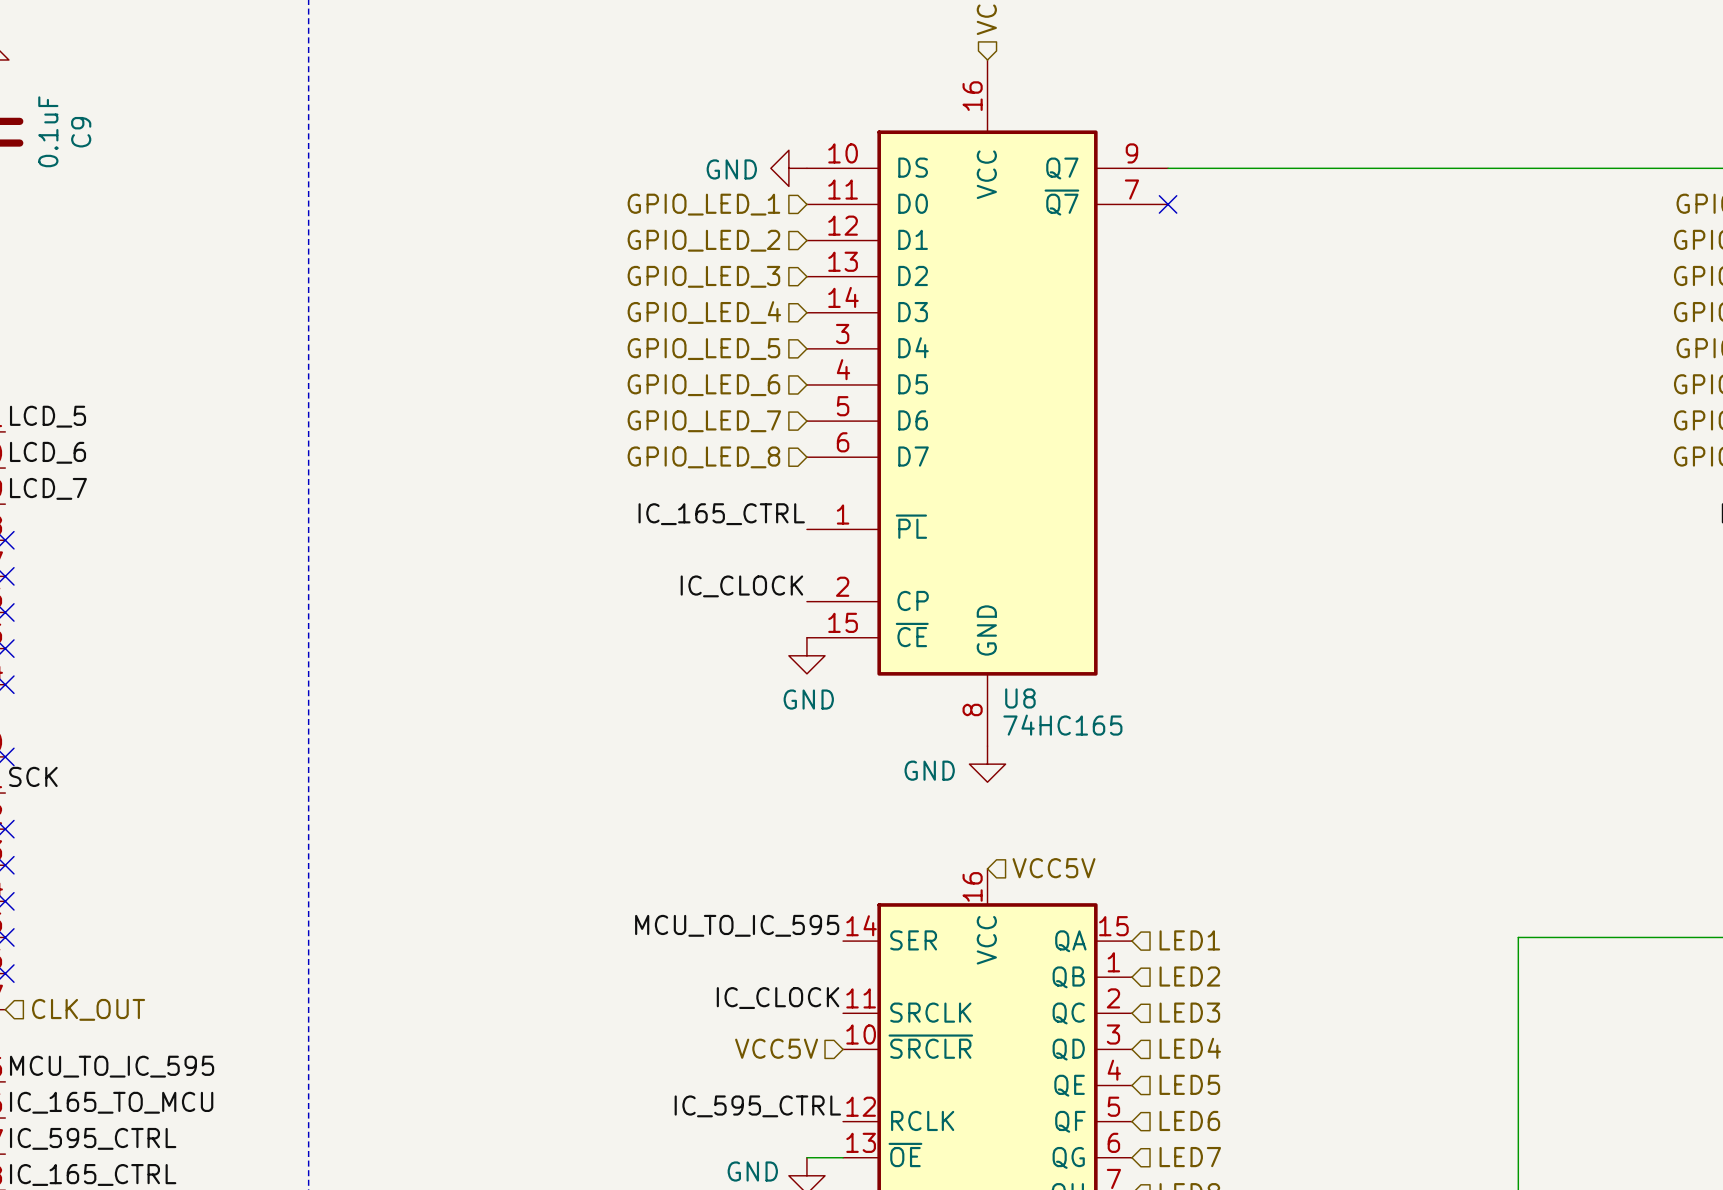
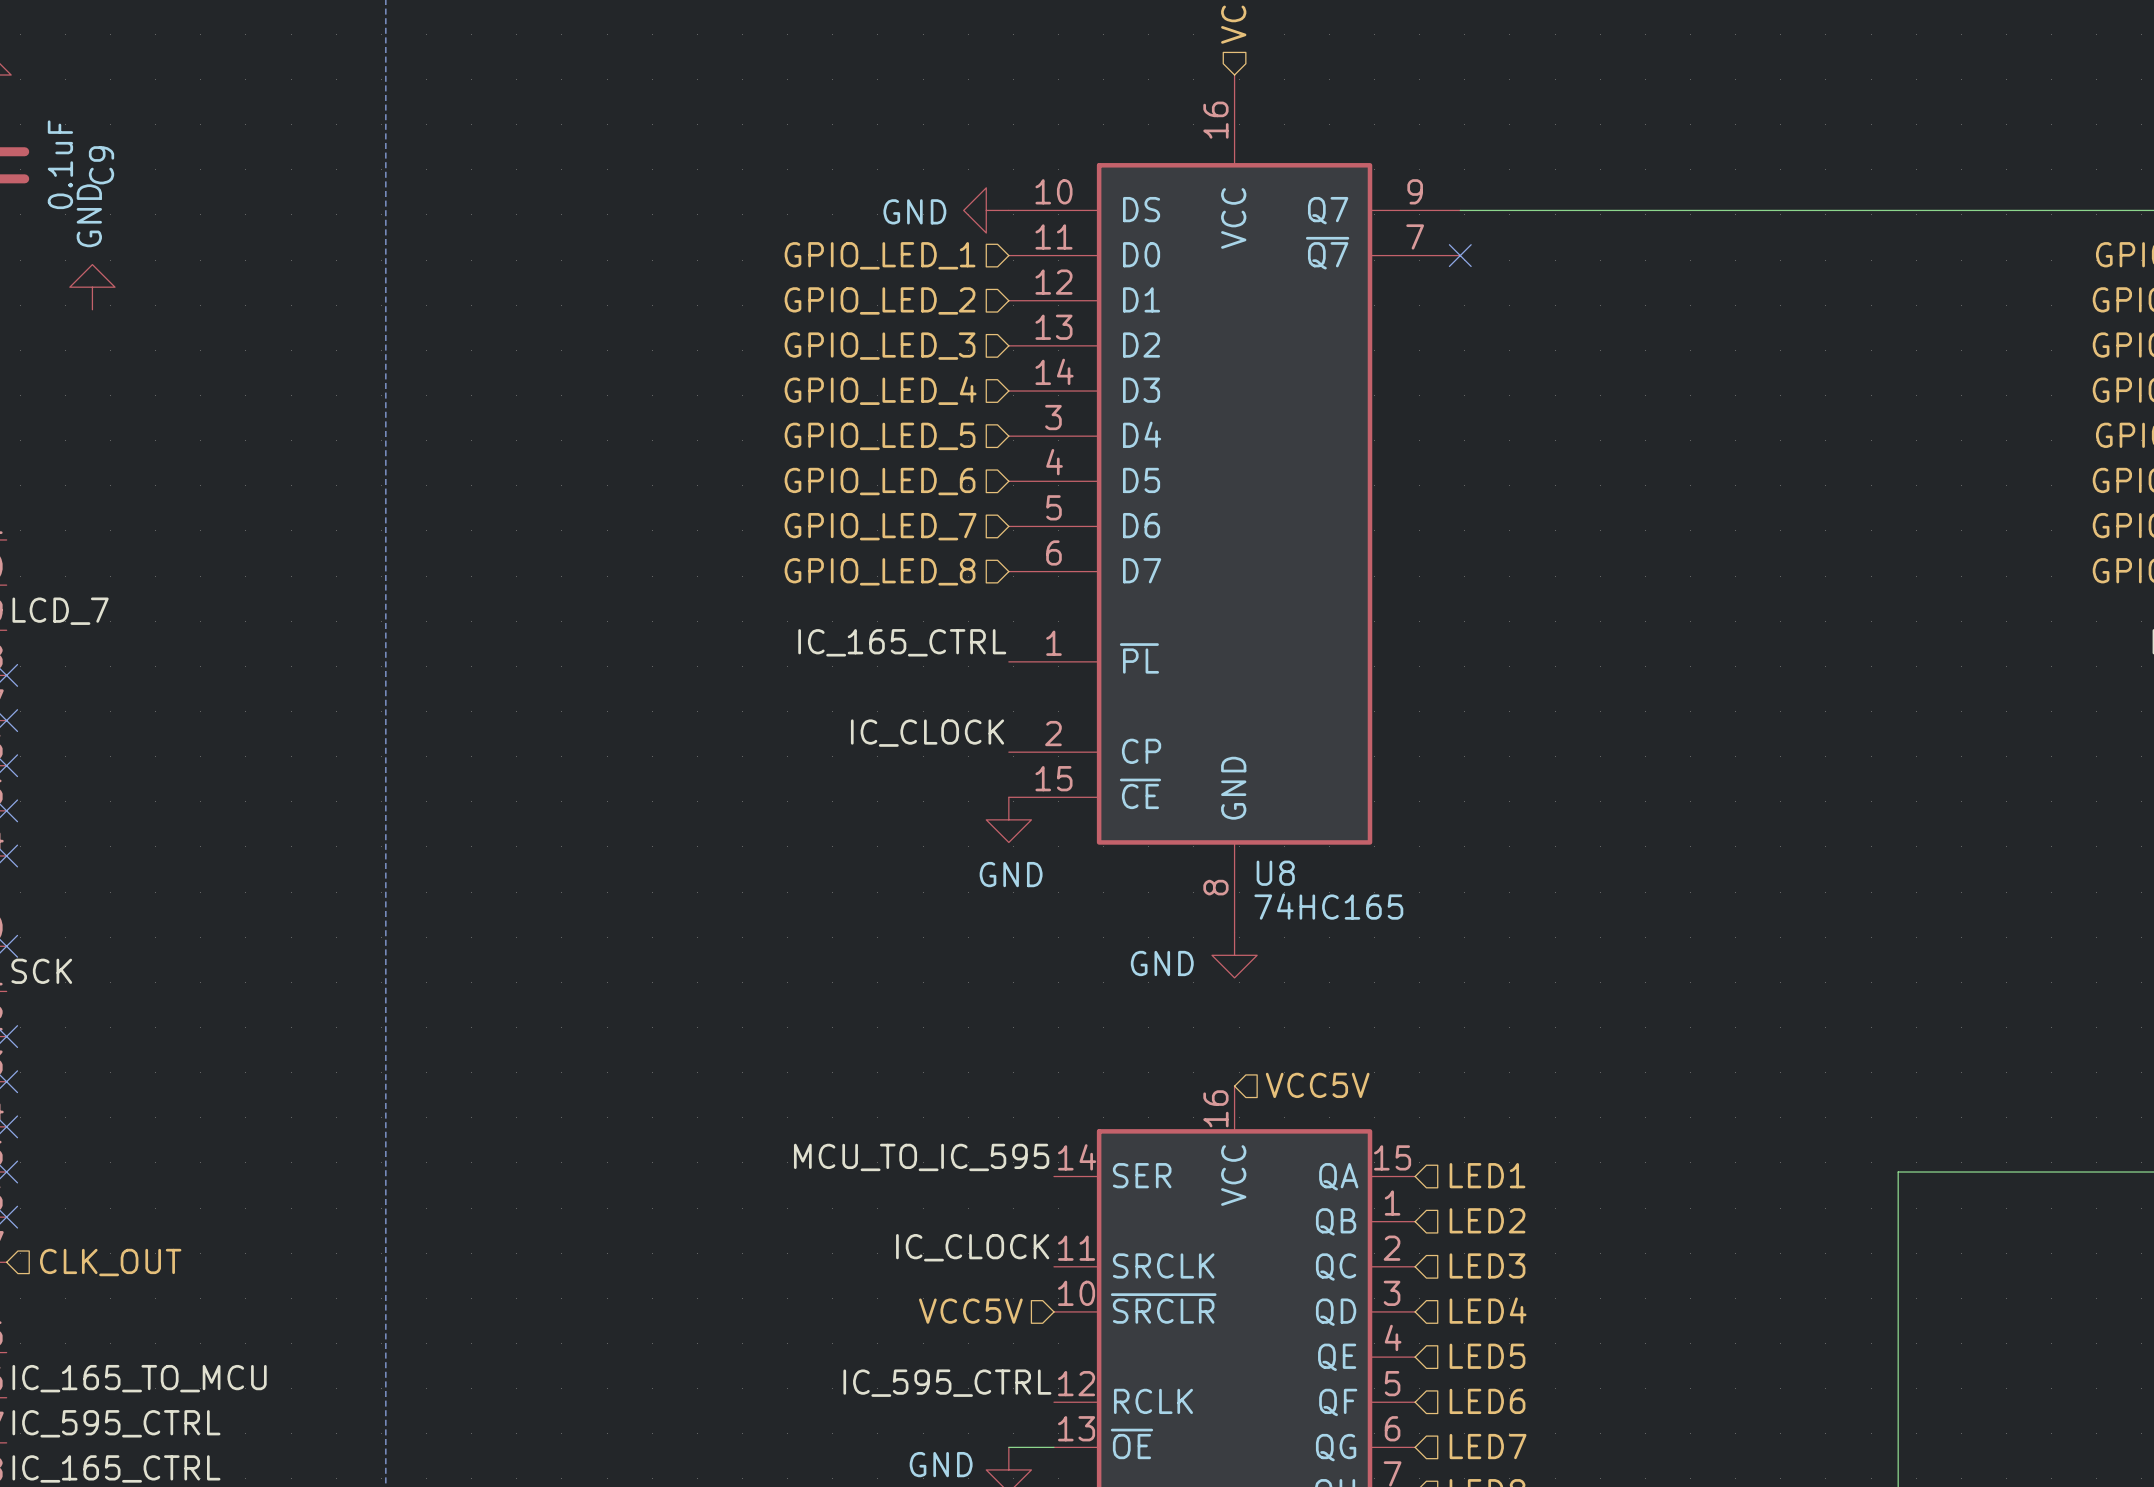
power symbol: none -> GND (92, 287)
label: LCD_5 (48, 416) -> none
label: LCD_6 (48, 452) -> none
label: MCU_TO_IC_595 (112, 1066) -> none

